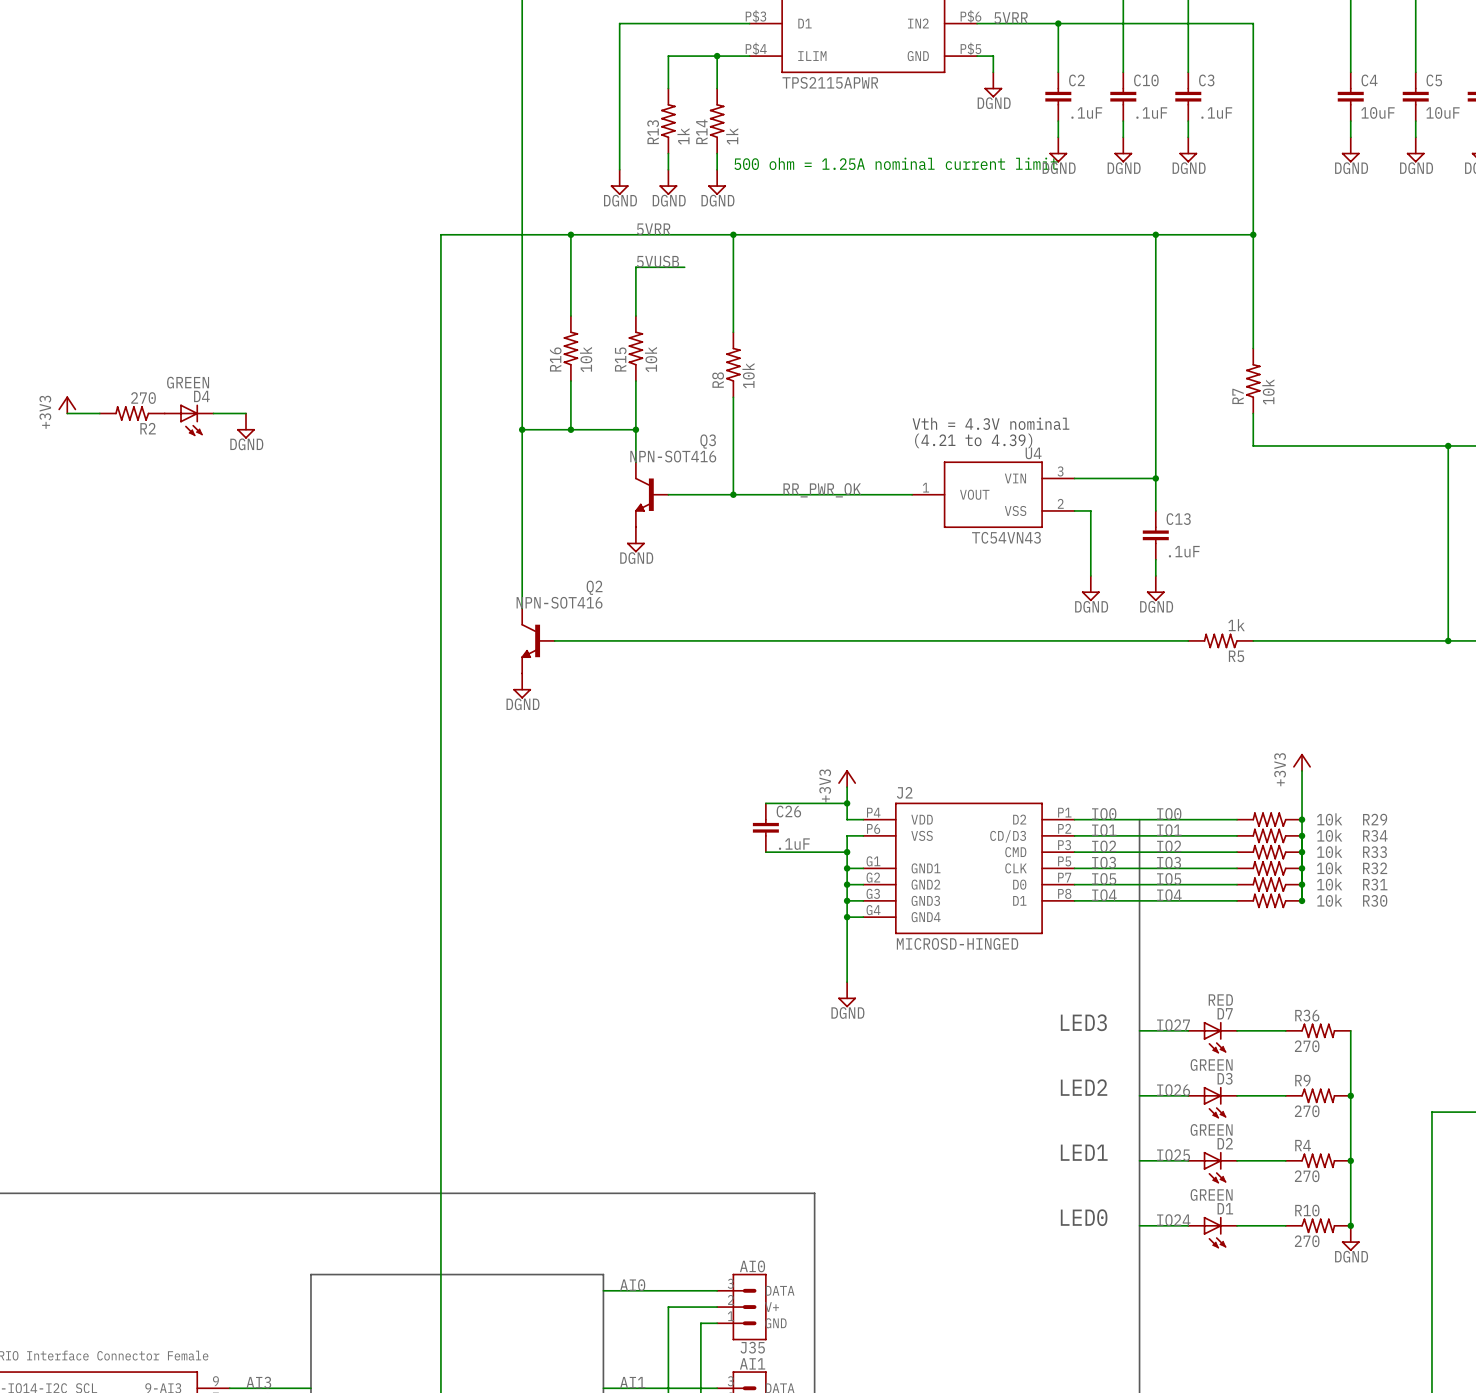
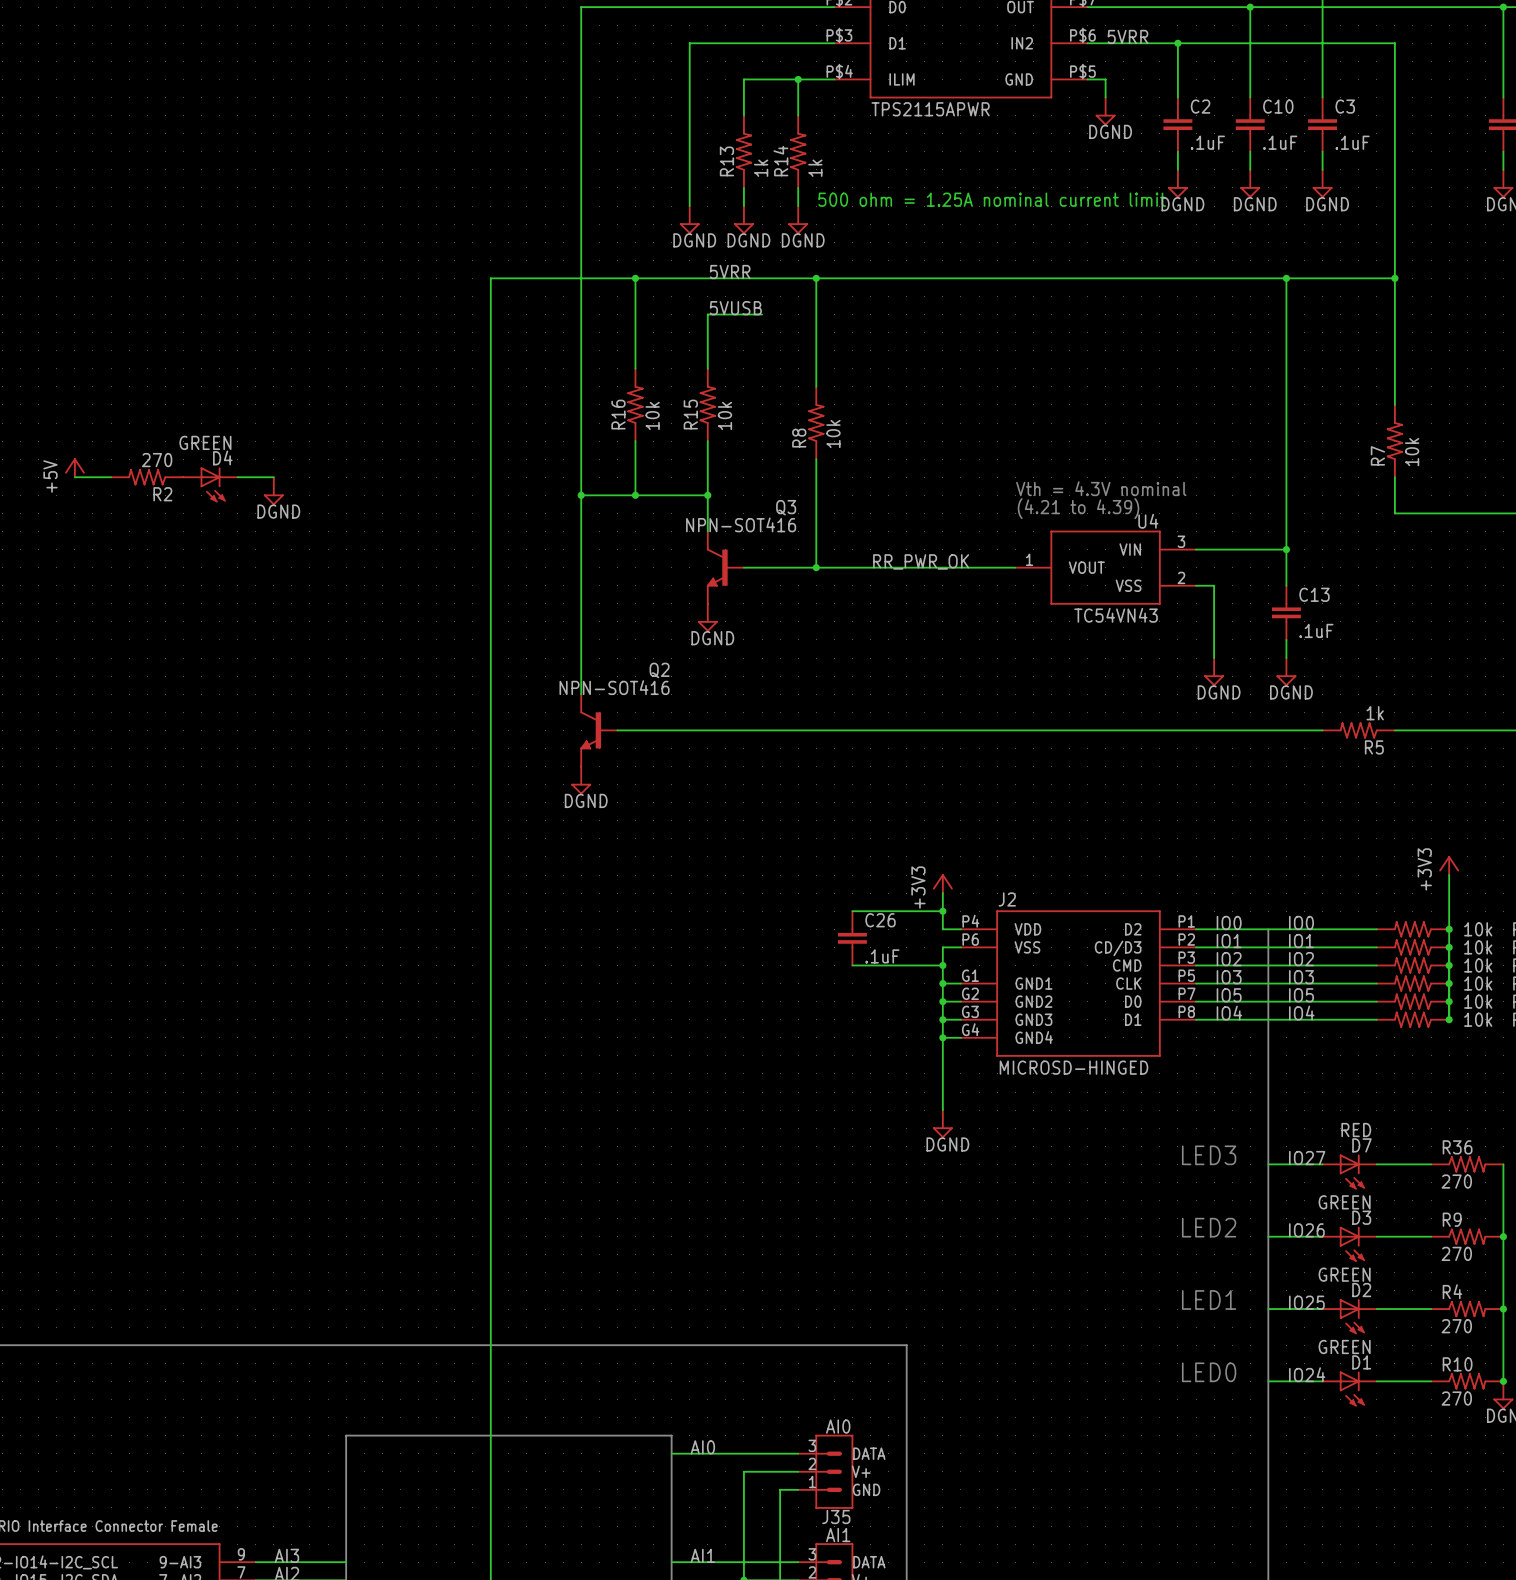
power symbol: +3V3 (67, 404) -> +5V (74, 467)

